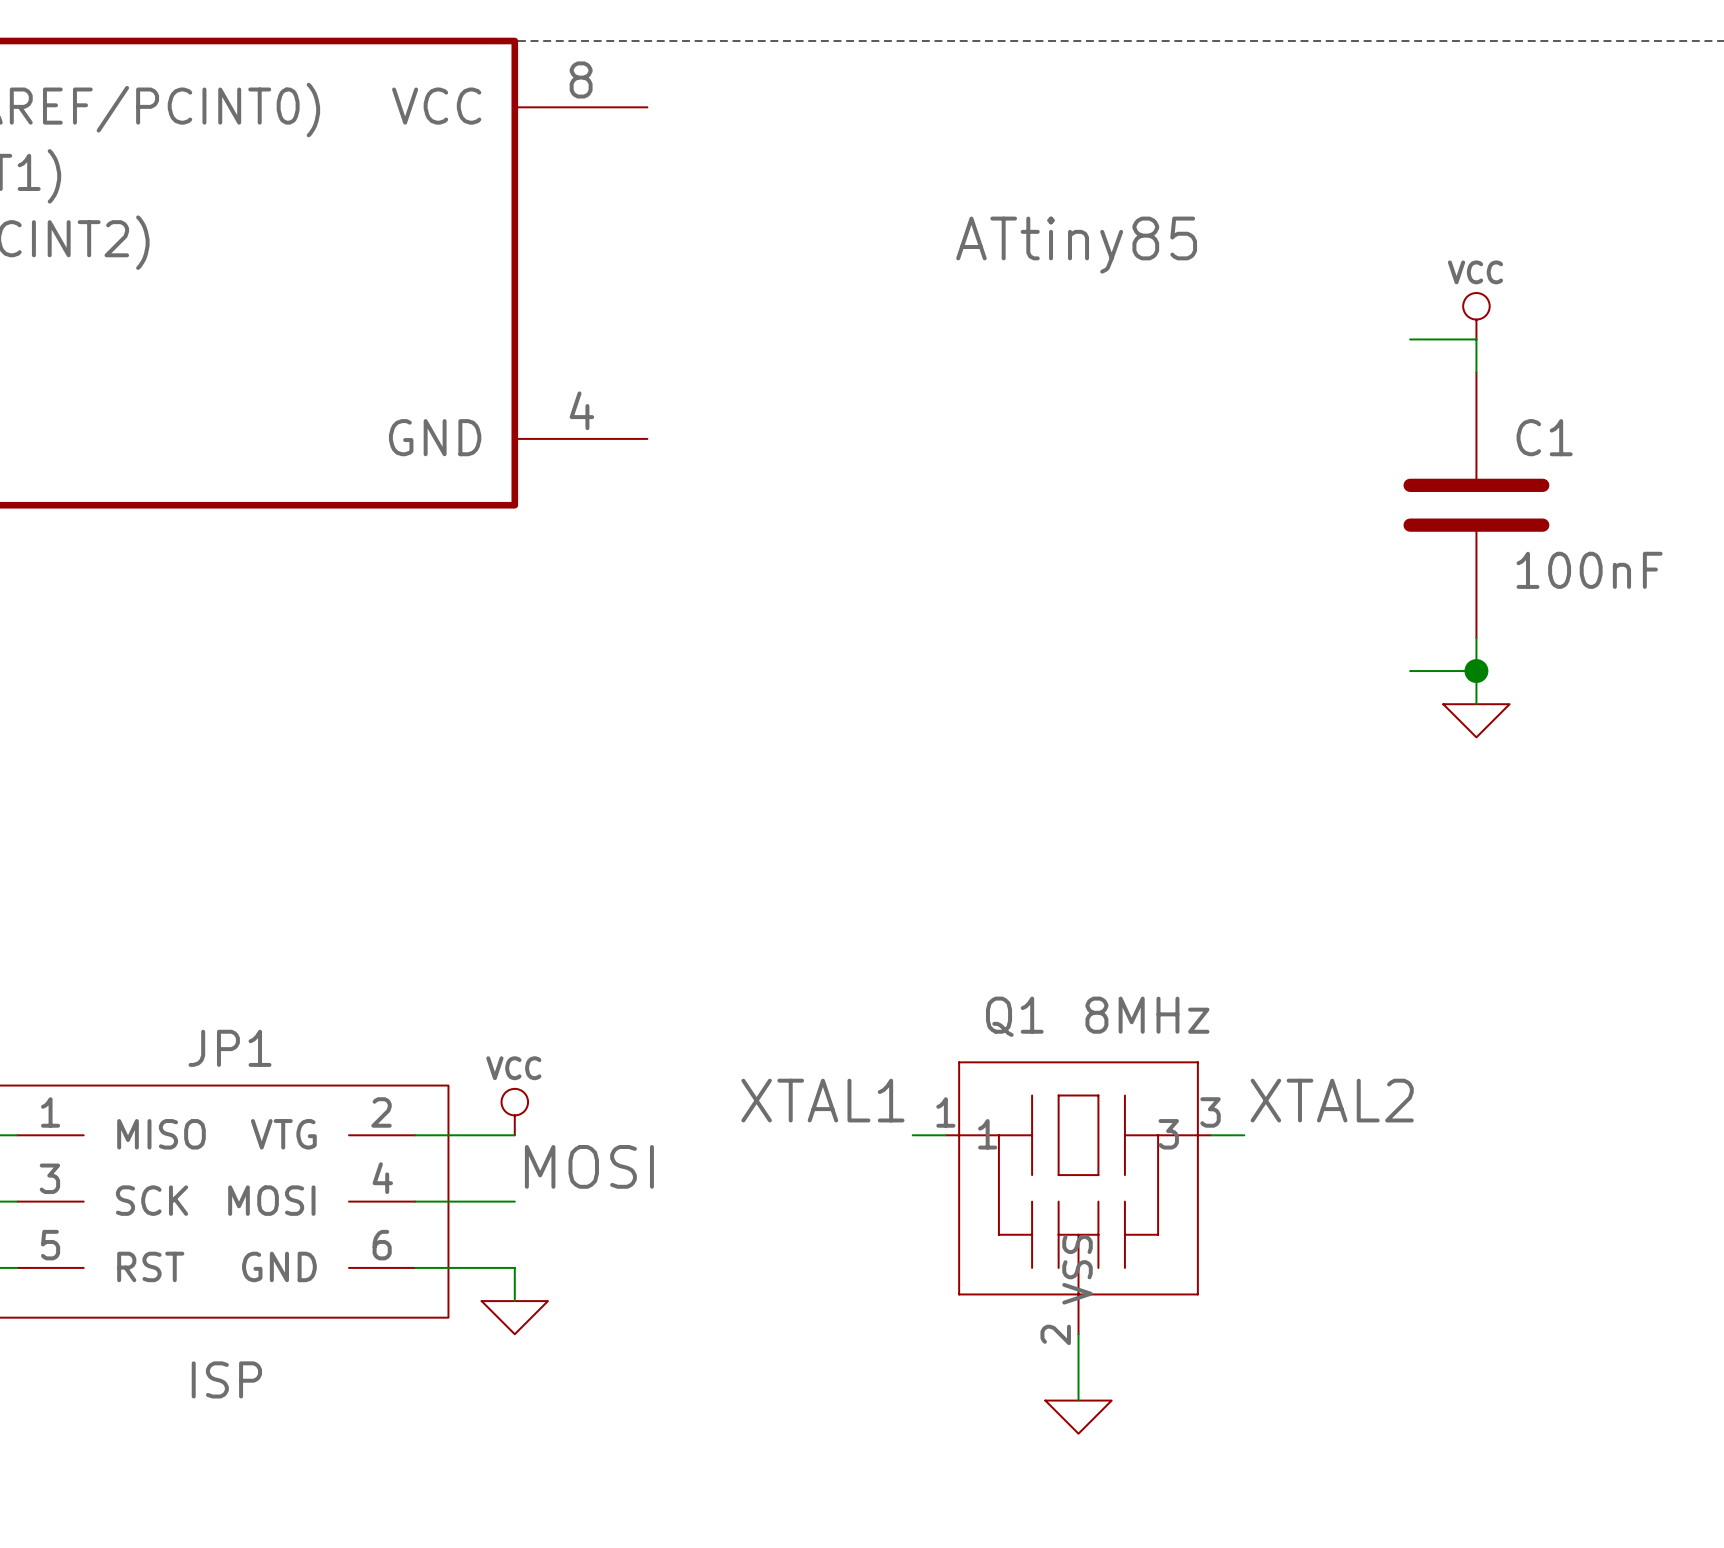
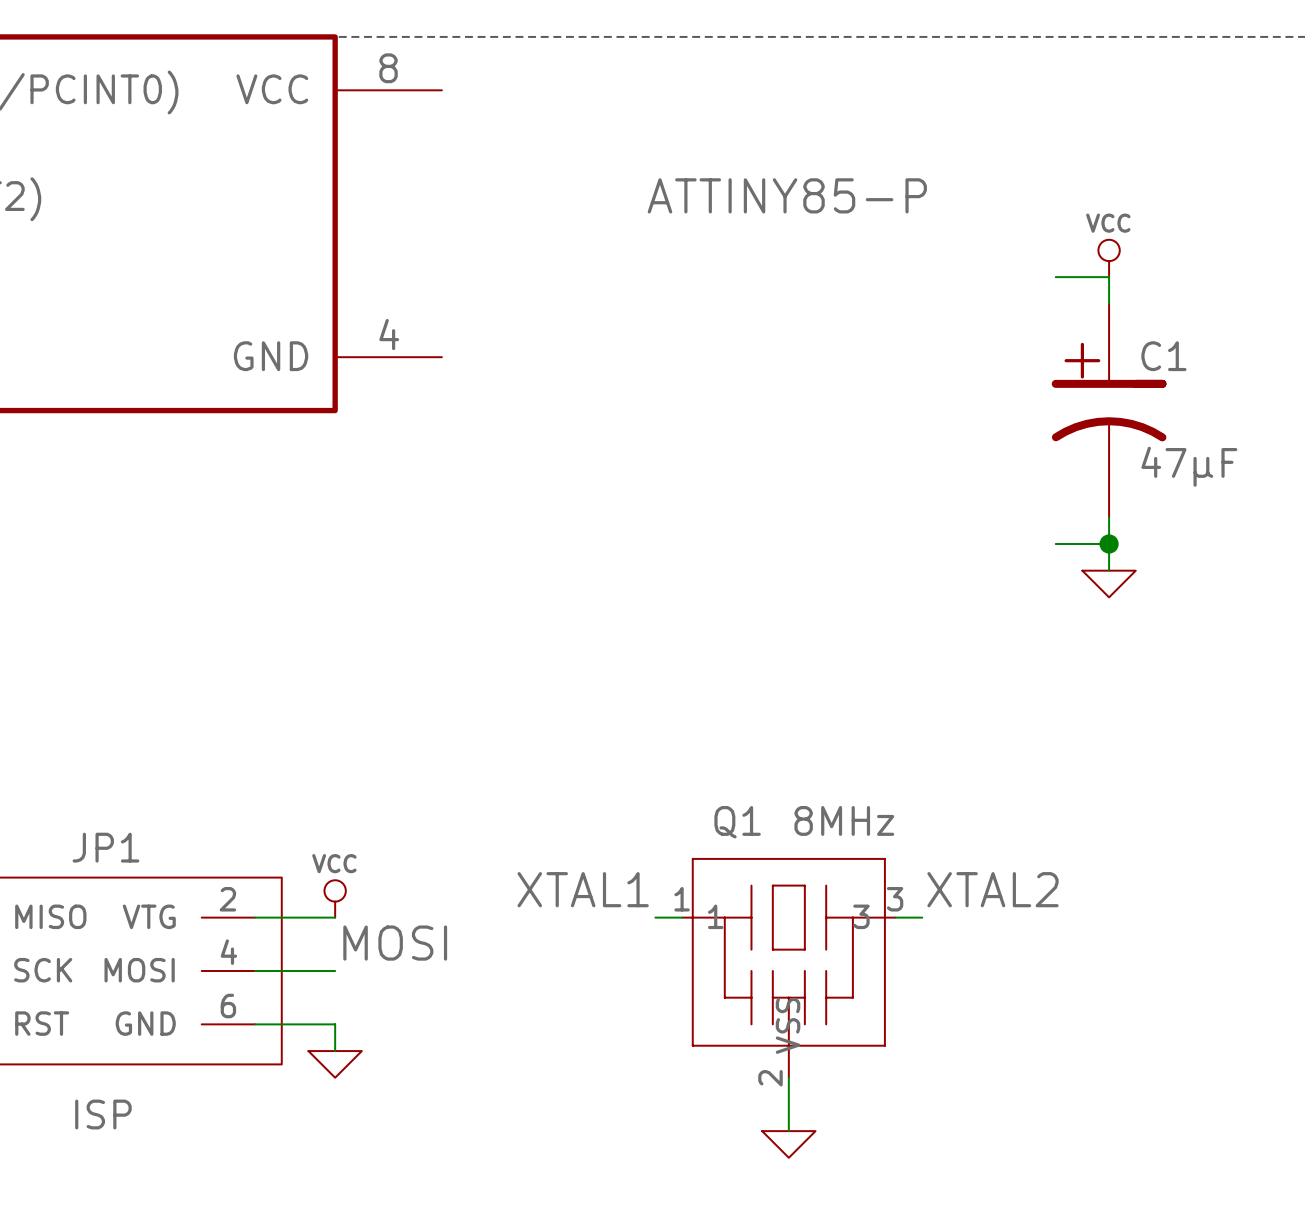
part value: ATtiny85 (1076, 245) -> ATTINY85-P (787, 195)
C1 symbol: [1403, 372, 1550, 638] -> [1051, 303, 1167, 518]
C1 value: 100nF (1589, 570) -> 47µF (1189, 466)

